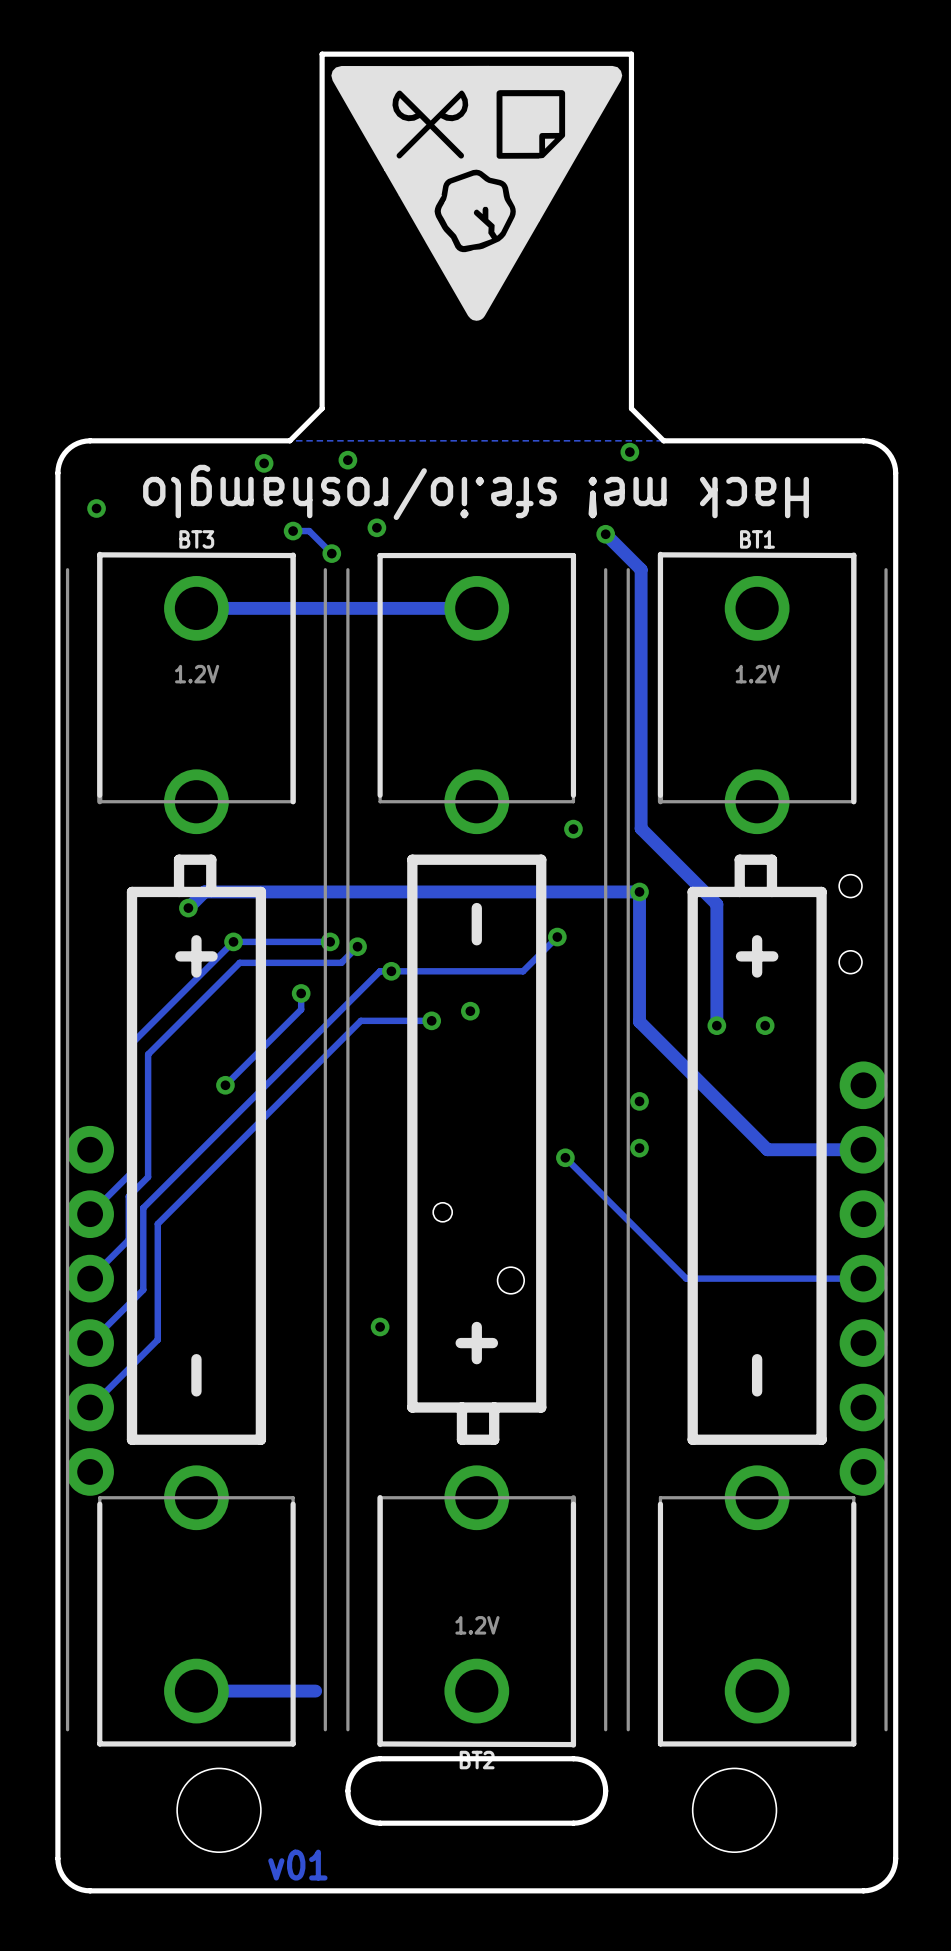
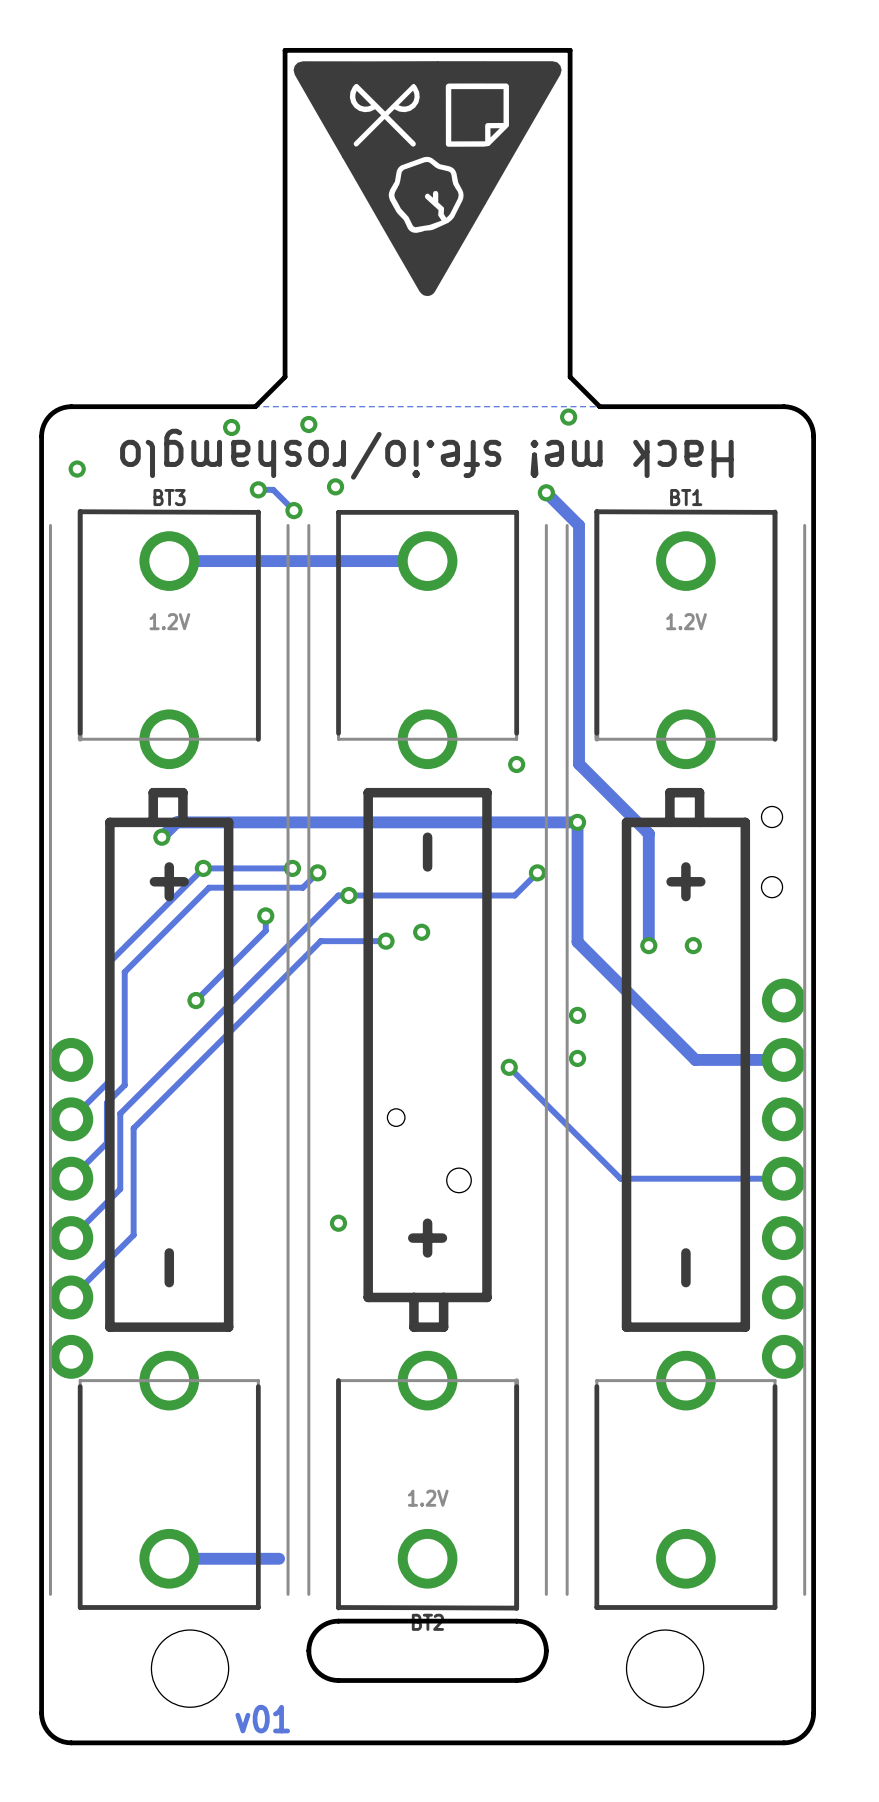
track: (557, 937) (523, 971) -> (537, 872) (514, 895) (470, 895)
via position: (557, 937) -> (537, 872)

